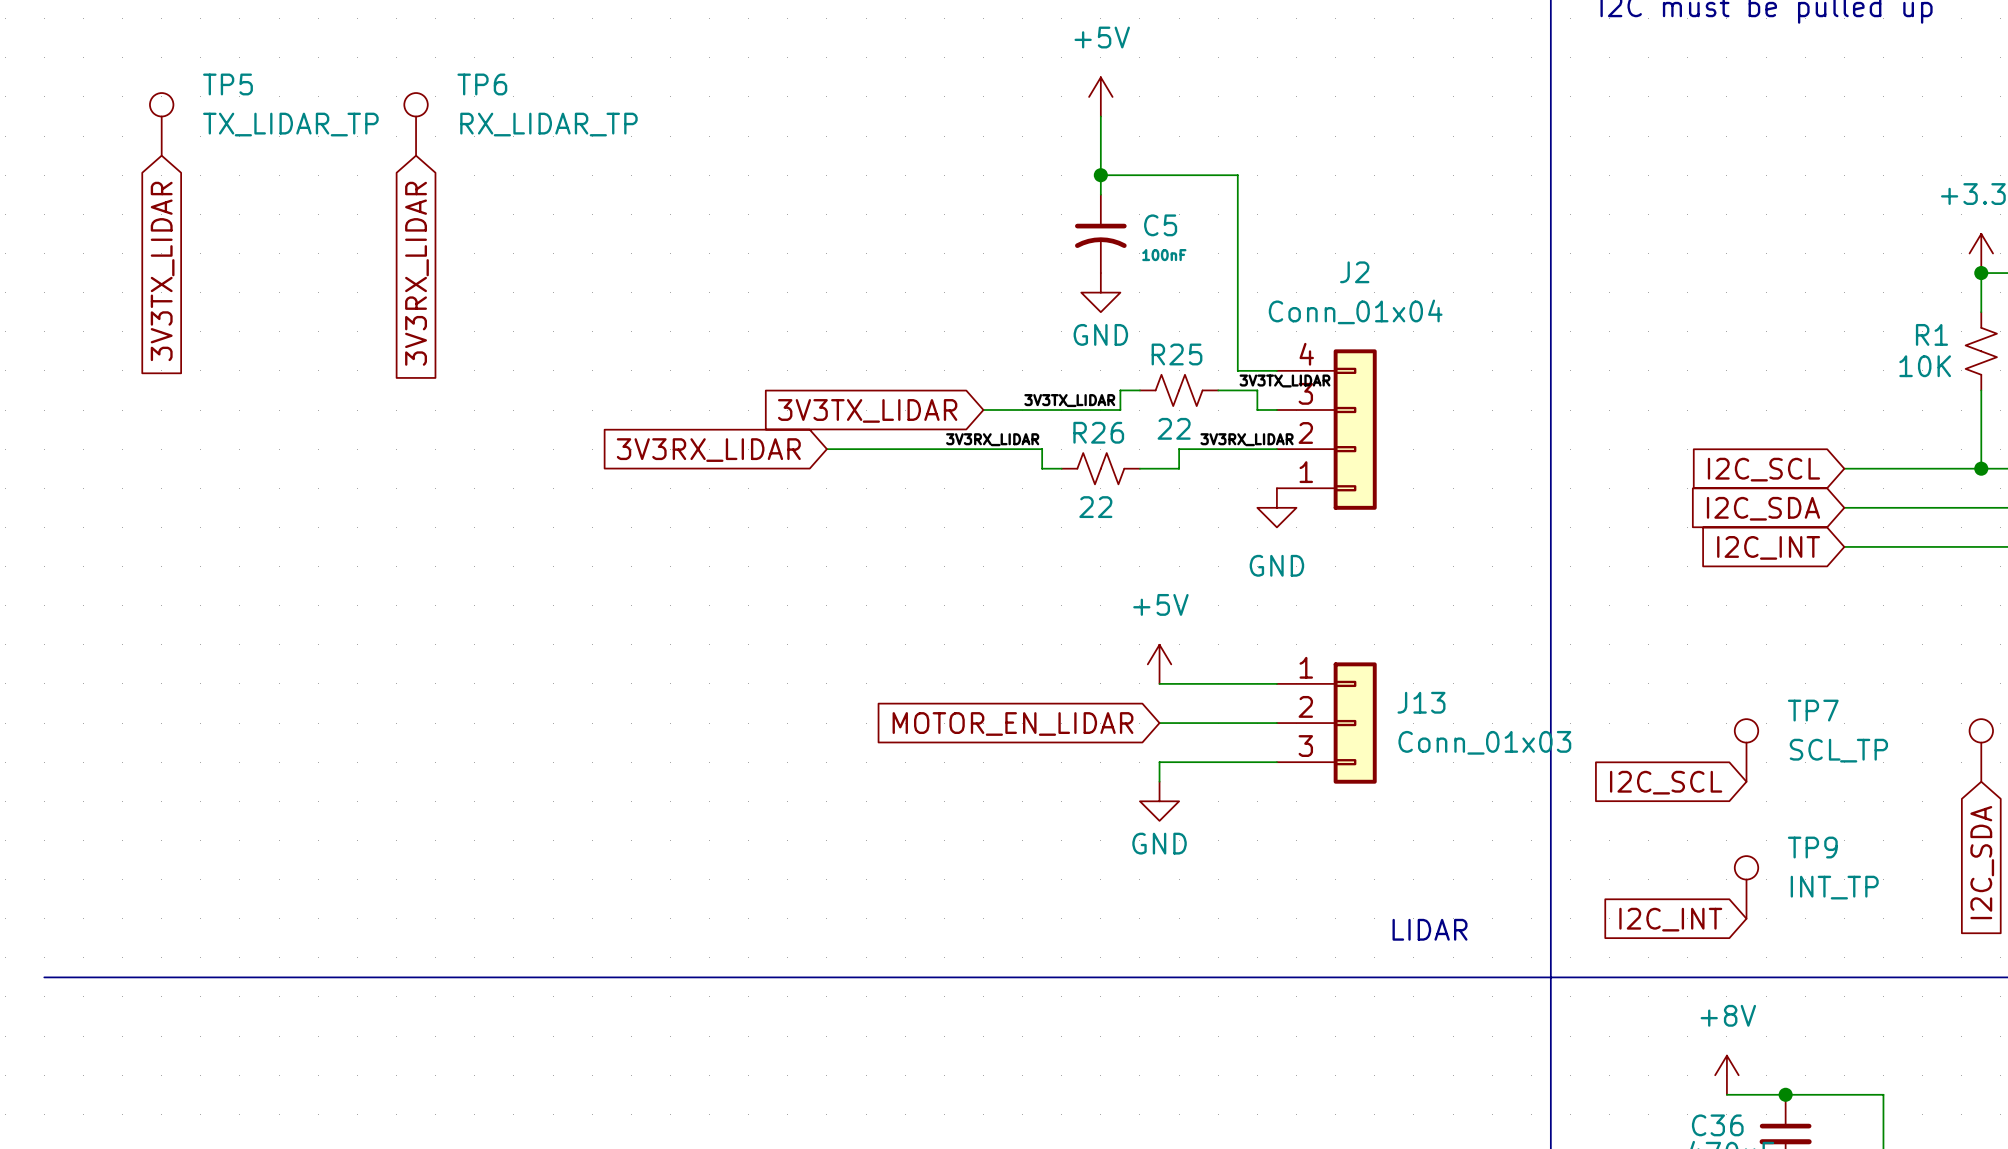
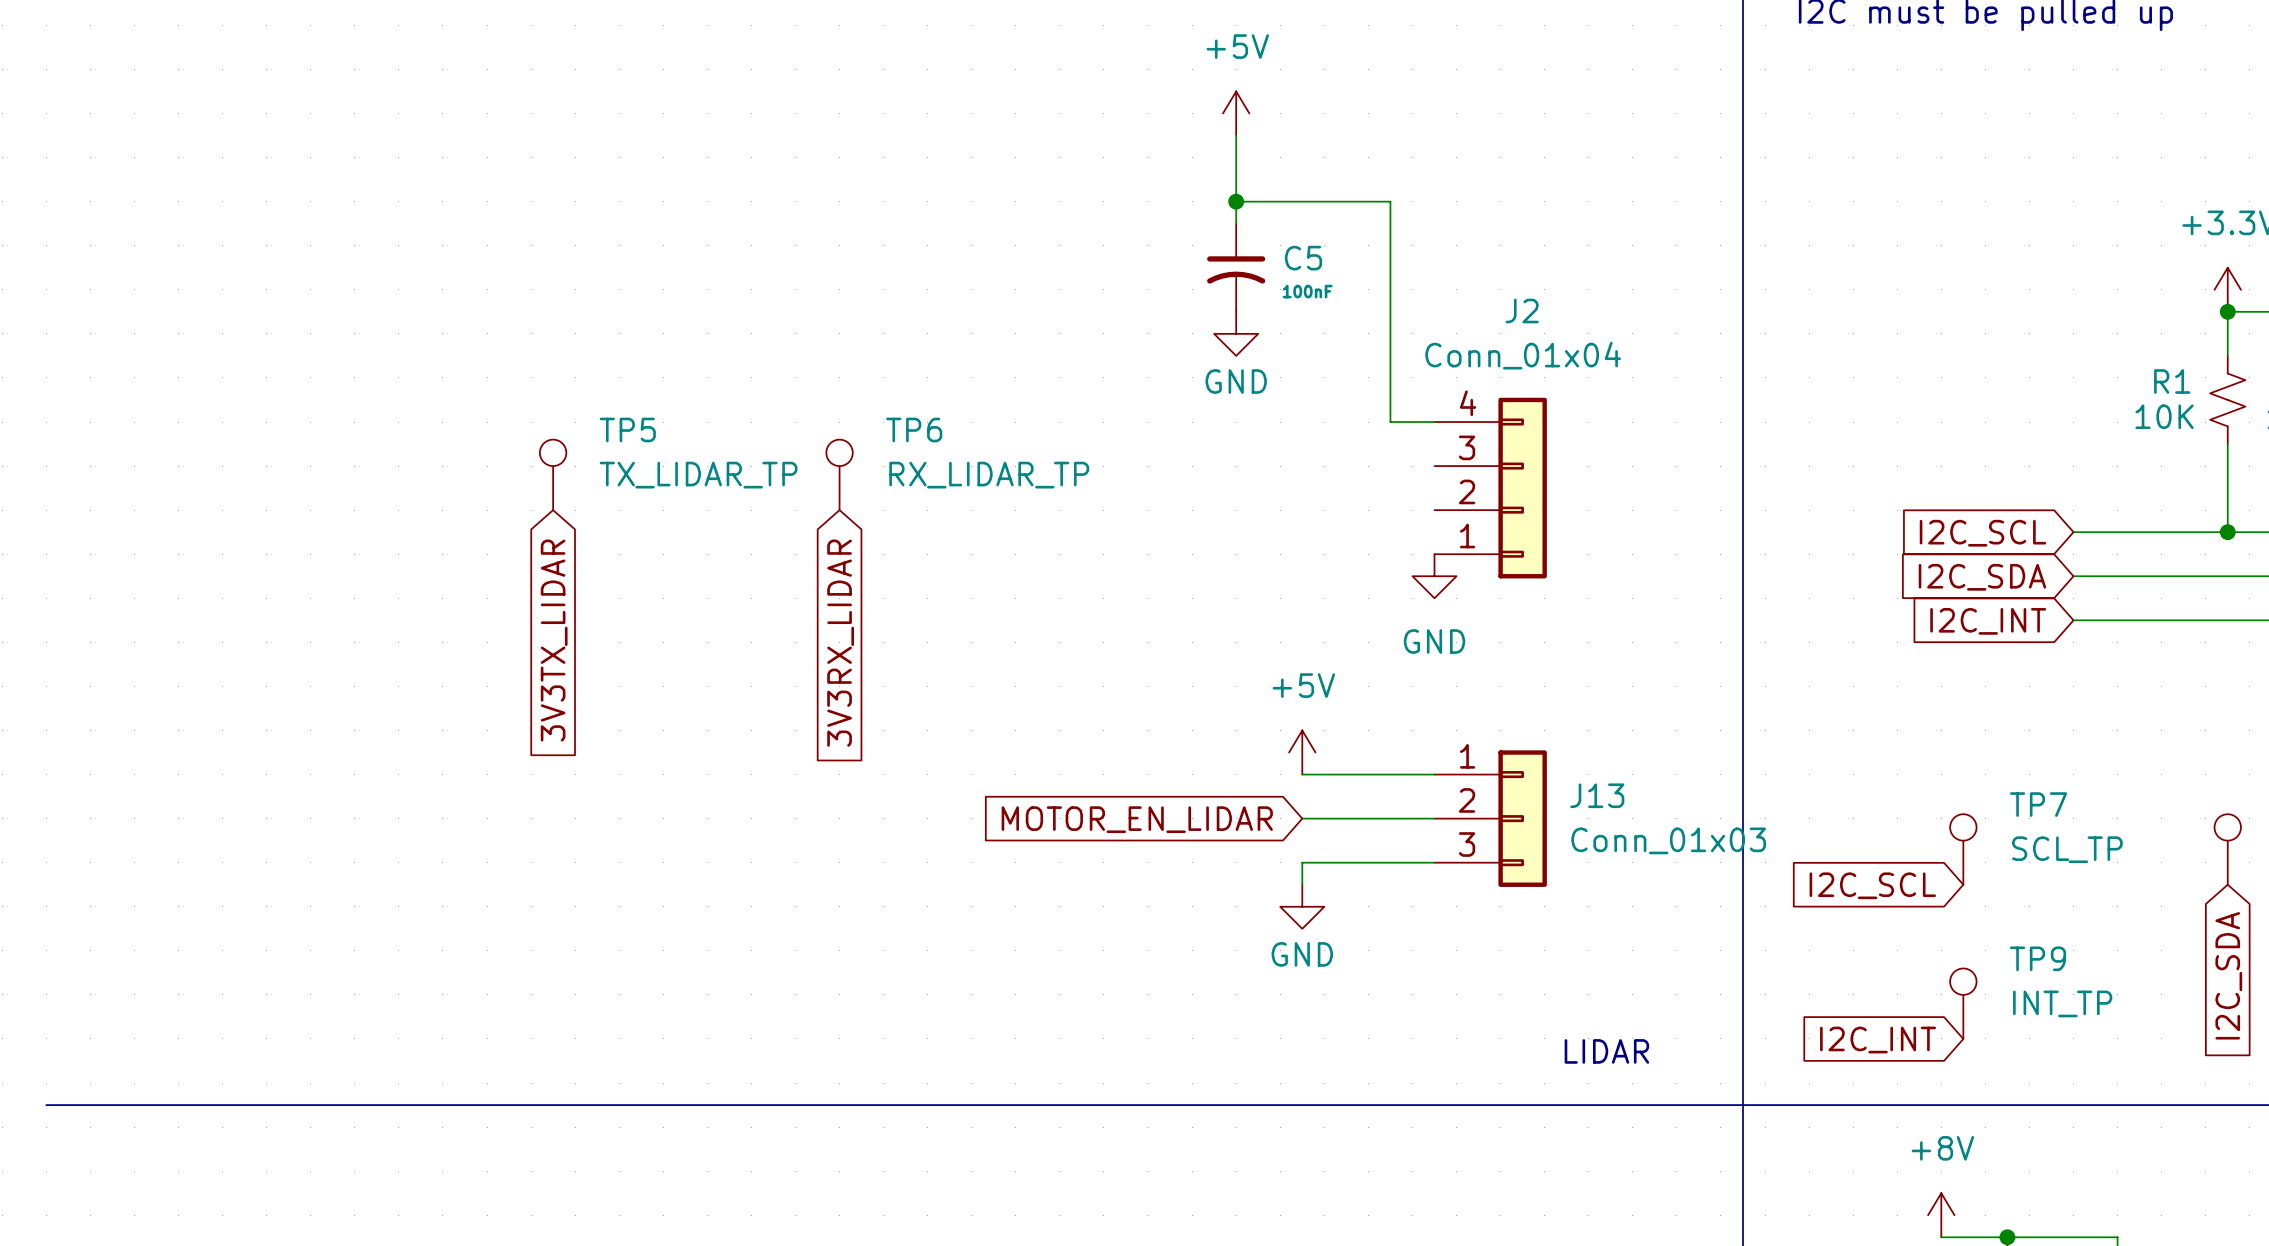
TP5 position: (161, 124) -> (553, 474)
TP6 position: (416, 124) -> (839, 474)
global label: 3V3TX_LIDAR (162, 271) -> none
global label: 3V3RX_LIDAR (416, 273) -> none
label: 3V3TX_LIDAR (1284, 380) -> none
wire: (1139, 390) (1120, 390) (1120, 410) (983, 410) -> none
R25: 22 (1179, 390) -> none
wire: (1218, 390) (1257, 390) (1257, 410) (1276, 410) -> none
label: 3V3TX_LIDAR (1069, 400) -> none
global label: 3V3TX_LIDAR (867, 410) -> none
label: 3V3RX_LIDAR (992, 439) -> none
label: 3V3RX_LIDAR (1247, 439) -> none
wire: (826, 449) (1042, 449) (1042, 468) (1061, 468) -> none
wire: (1276, 449) (1179, 449) (1179, 468) (1139, 468) -> none
global label rotation: 0° (708, 450) -> 90° counterclockwise (840, 643)
R26: 22 (1100, 468) -> none
global label: none -> 3V3TX_LIDAR (554, 640)

